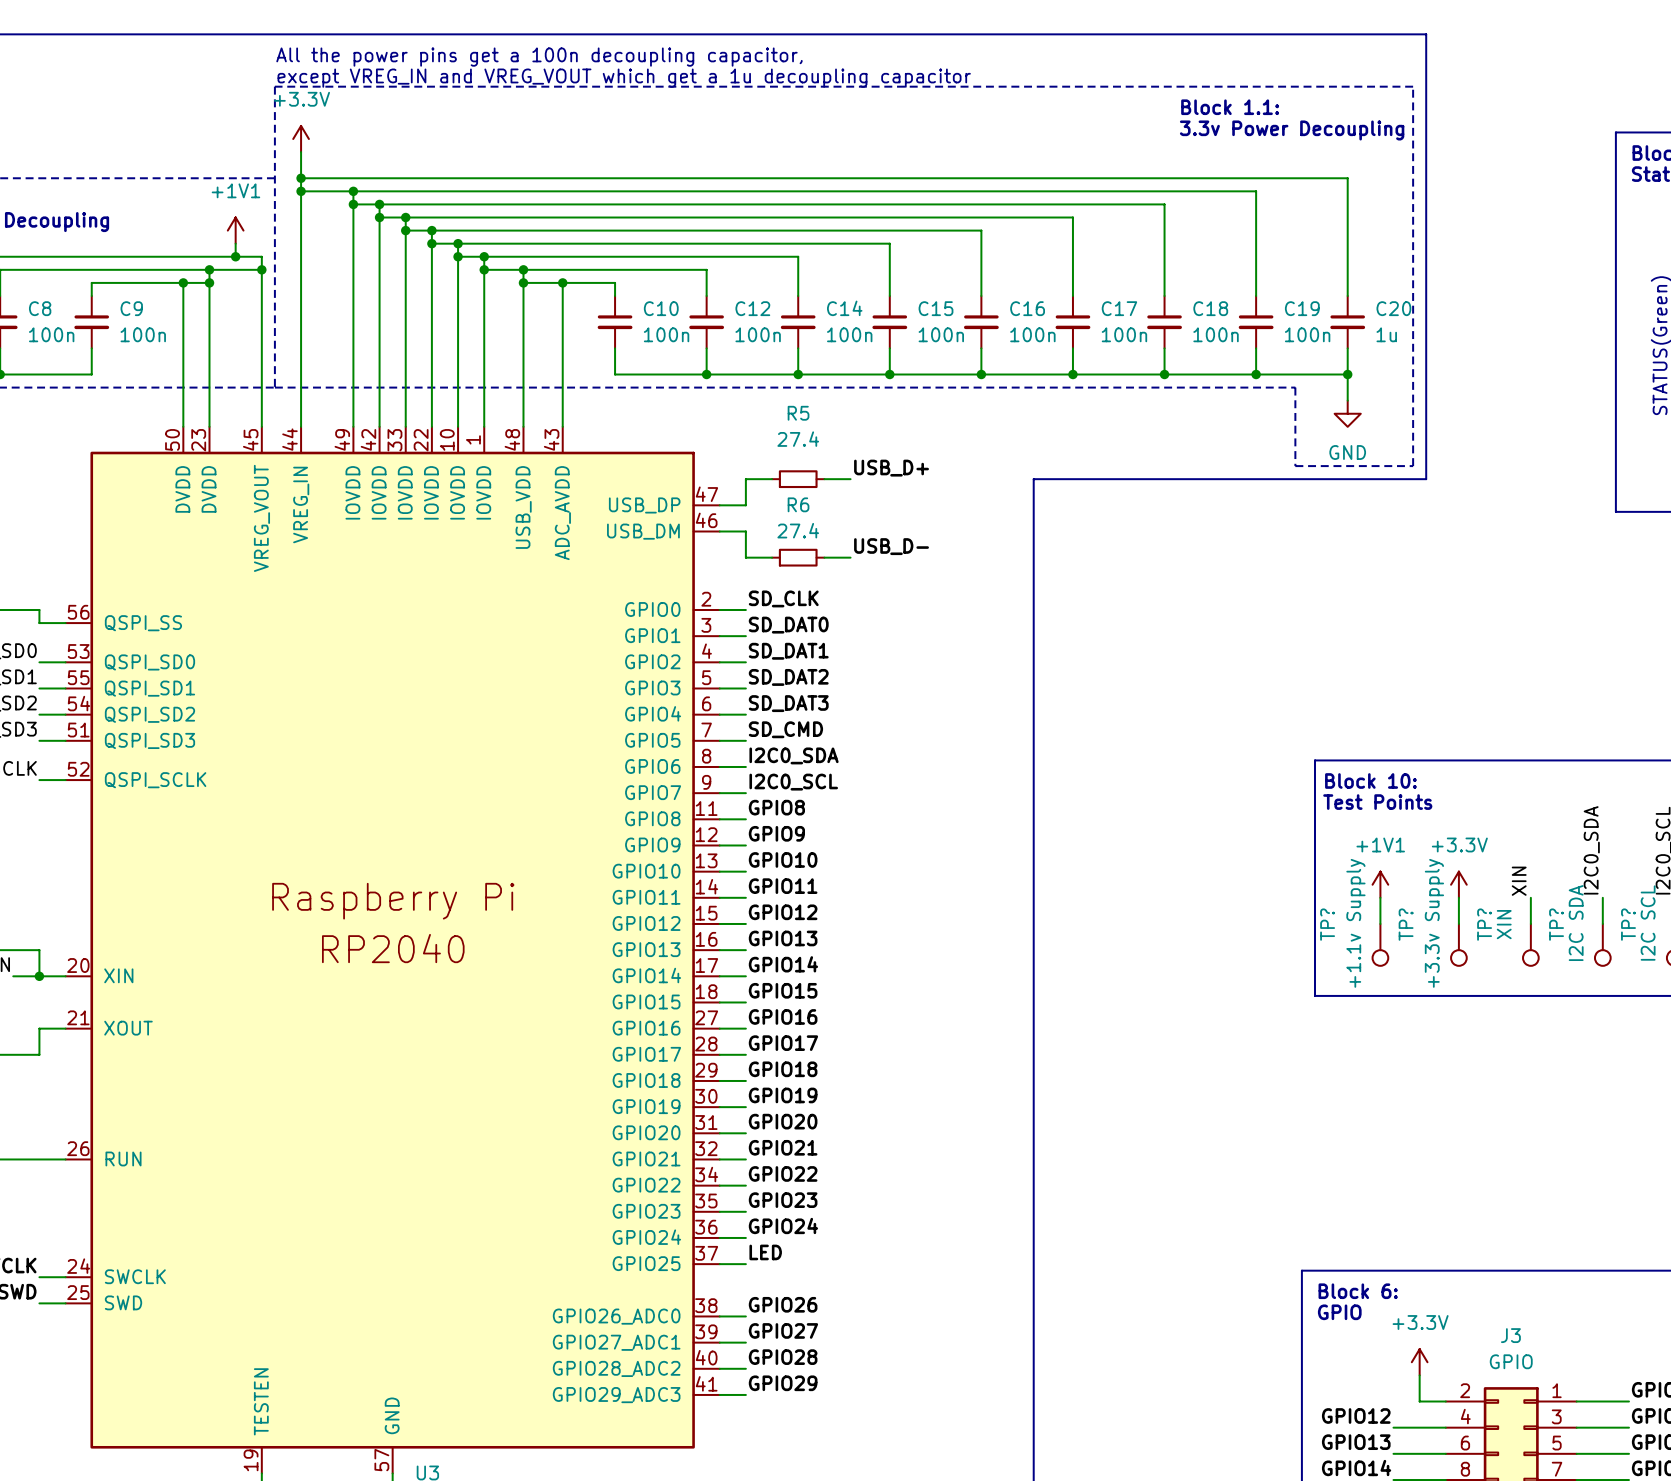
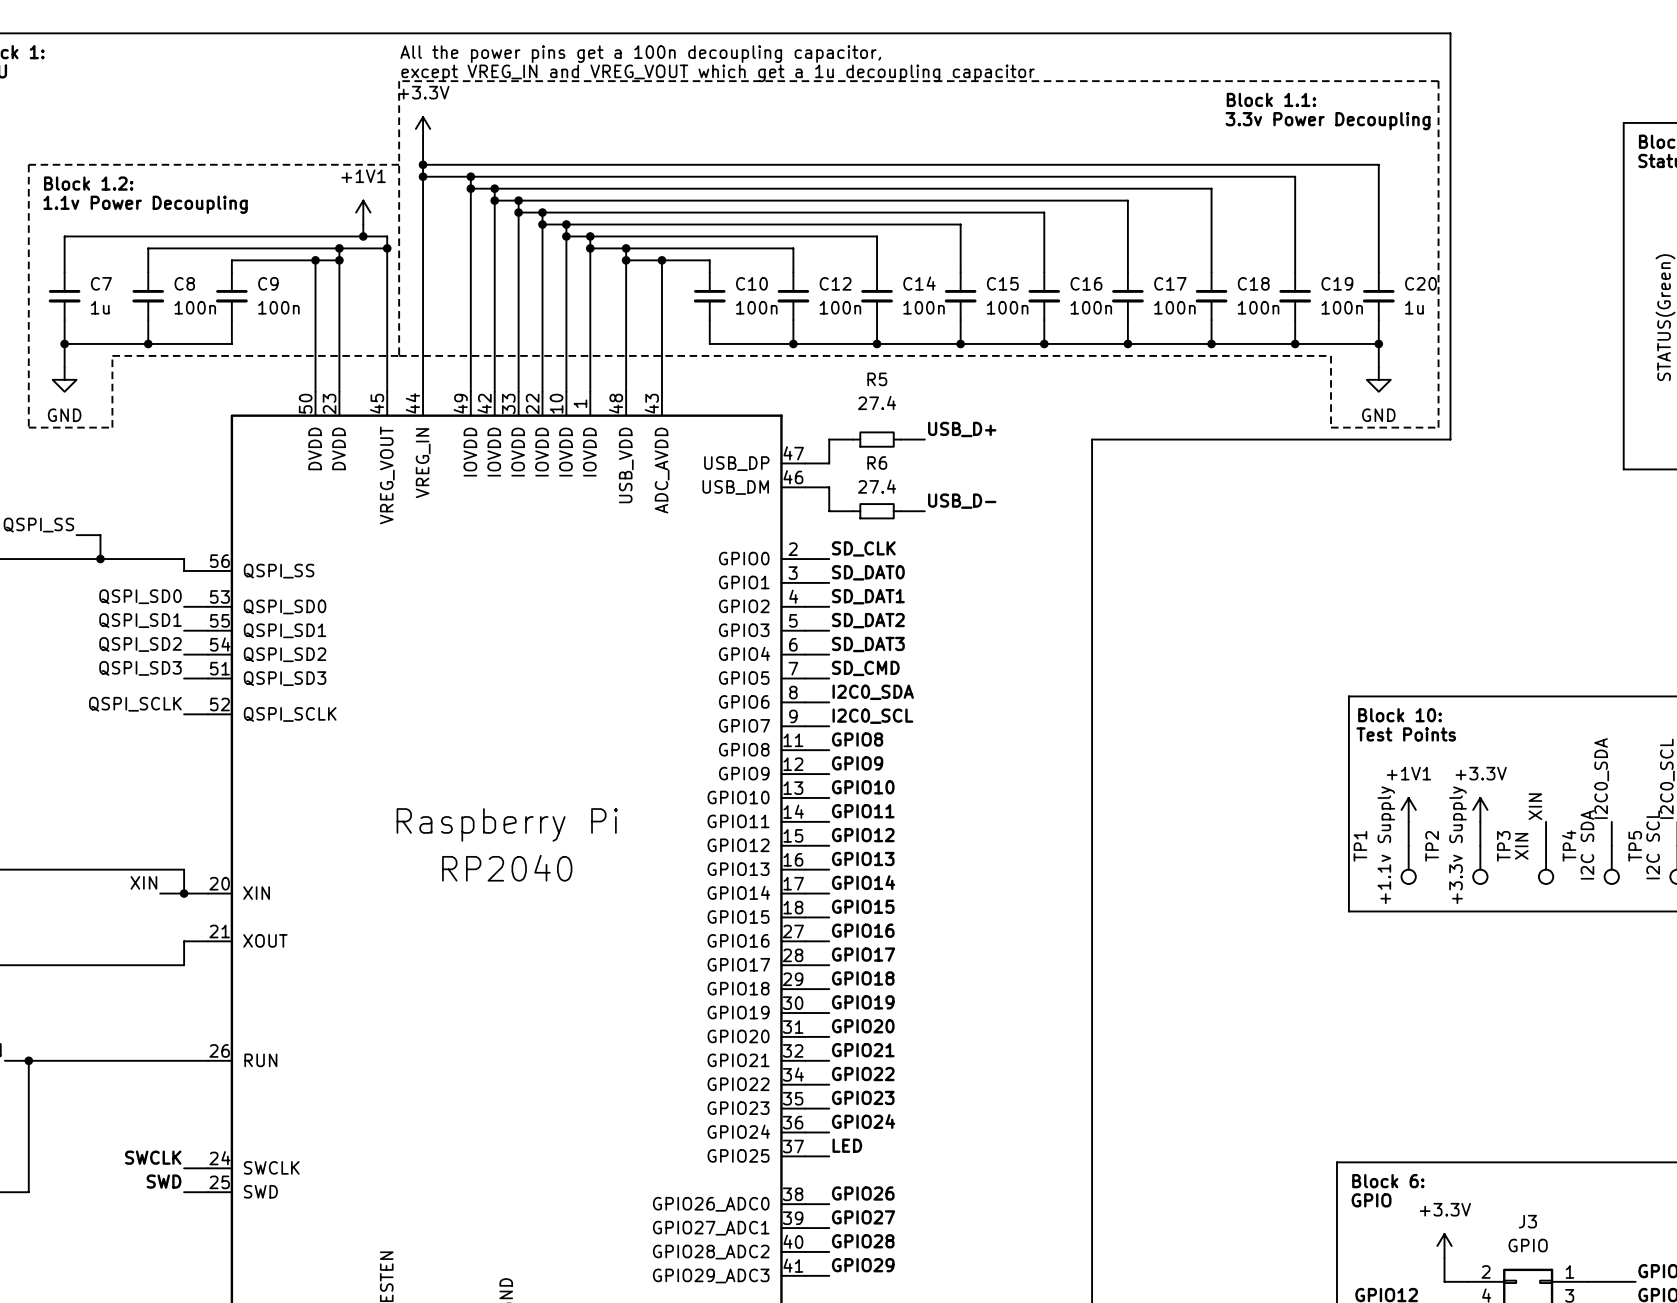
TP? name: TP? (1327, 924) -> TP1 (1360, 846)
TP? name: TP? (1406, 924) -> TP2 (1432, 846)
TP? name: TP? (1484, 924) -> TP3 (1503, 846)
TP? name: TP? (1556, 924) -> TP4 (1569, 846)
TP? name: TP? (1628, 924) -> TP5 (1635, 846)

